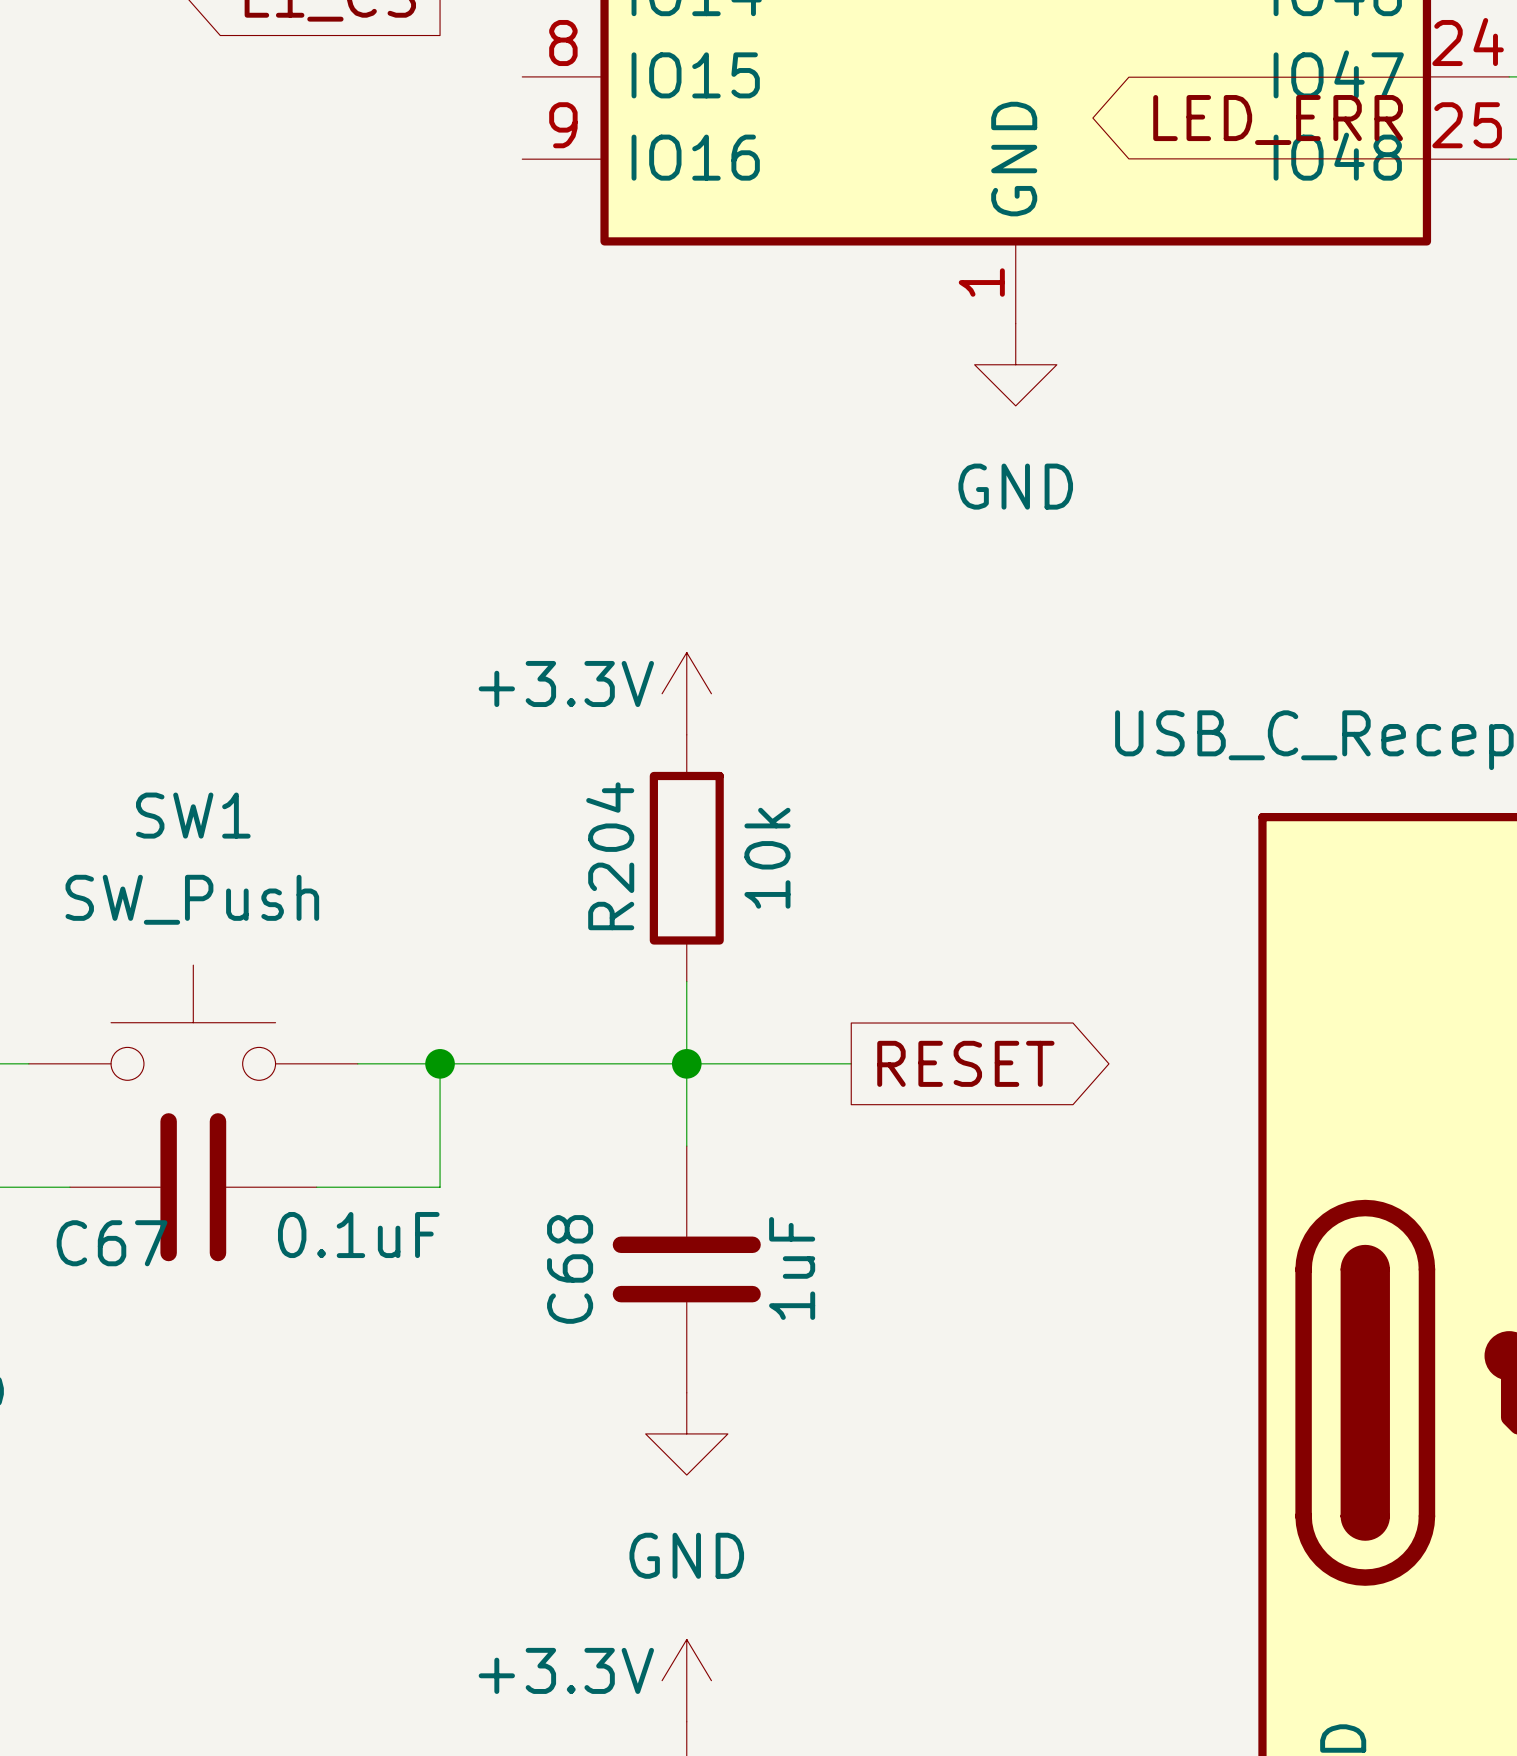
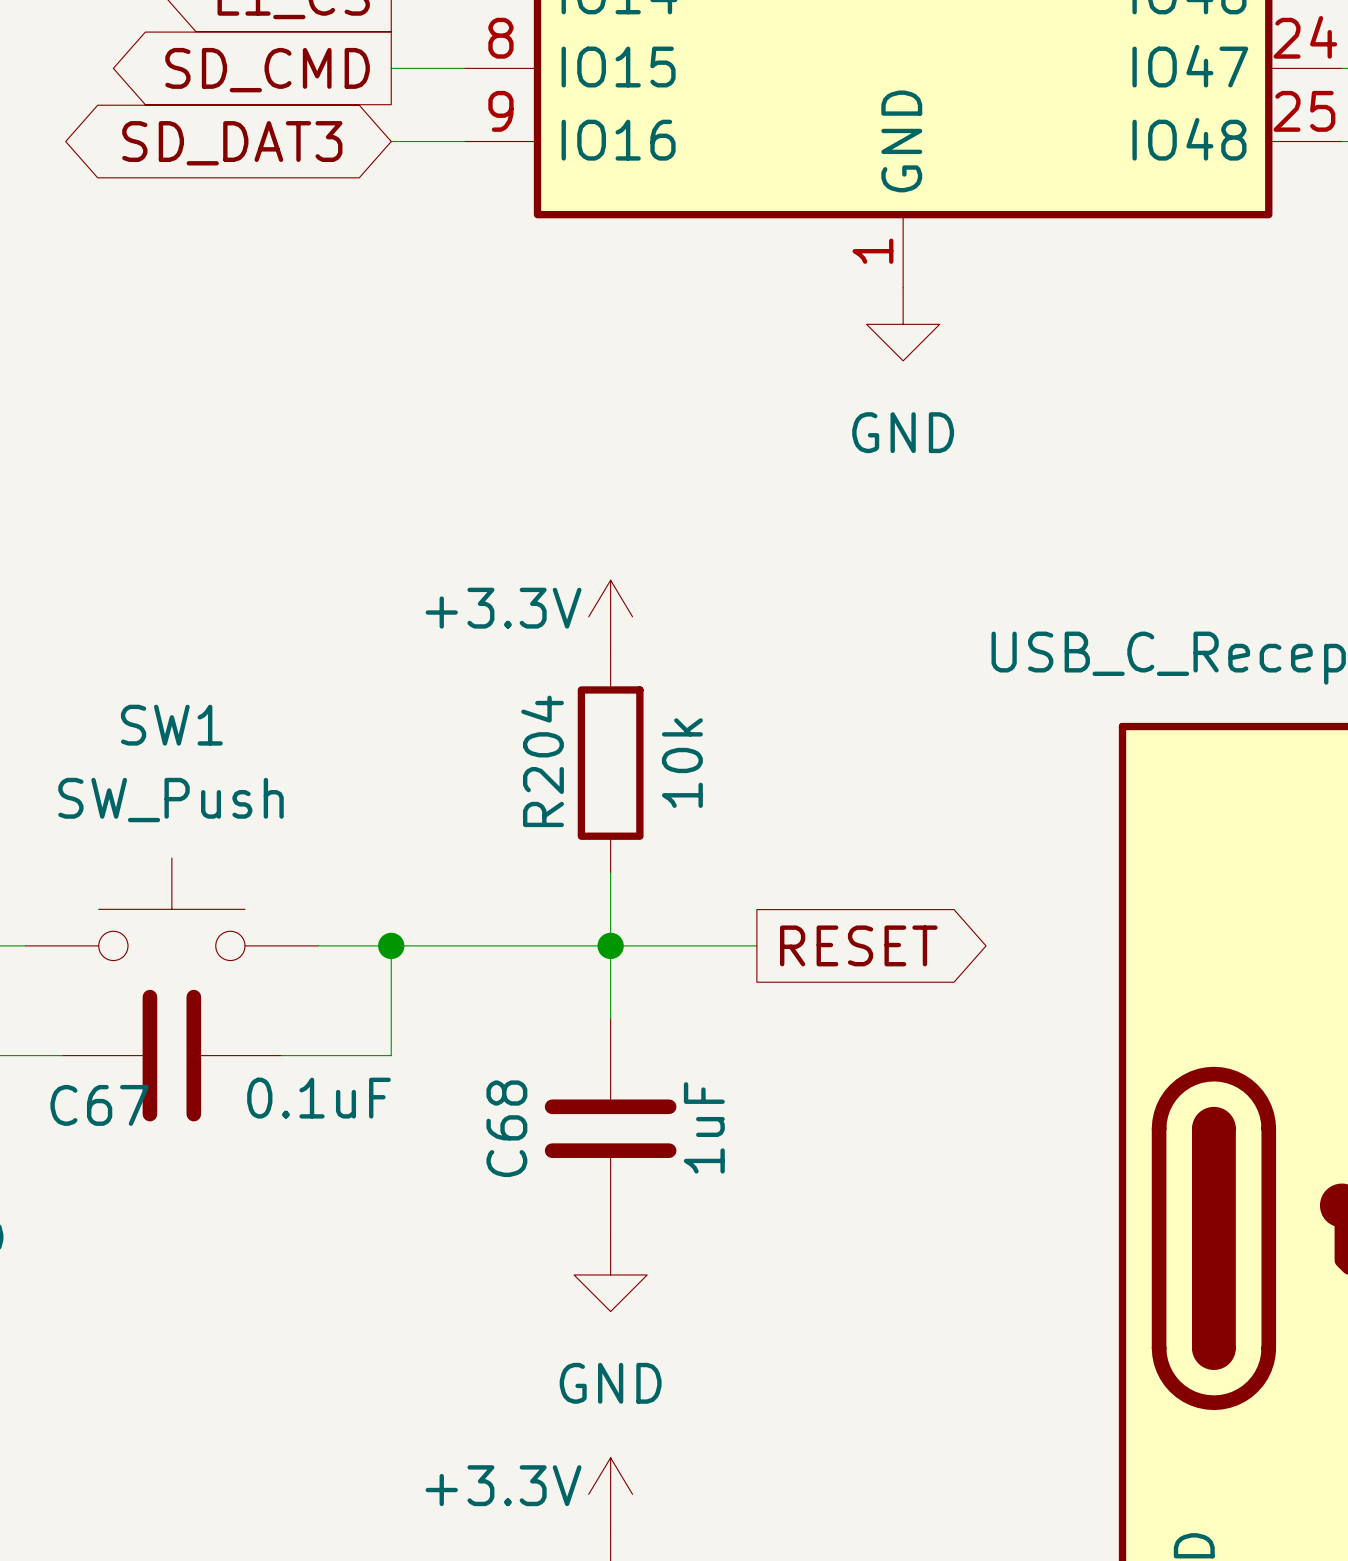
wire: none -> (391, 68) (464, 68)
global label: none -> SD_CMD (267, 70)
global label: LED_ERR (1278, 120) -> none
wire: none -> (391, 141) (464, 141)
global label: none -> SD_DAT3 (232, 143)

